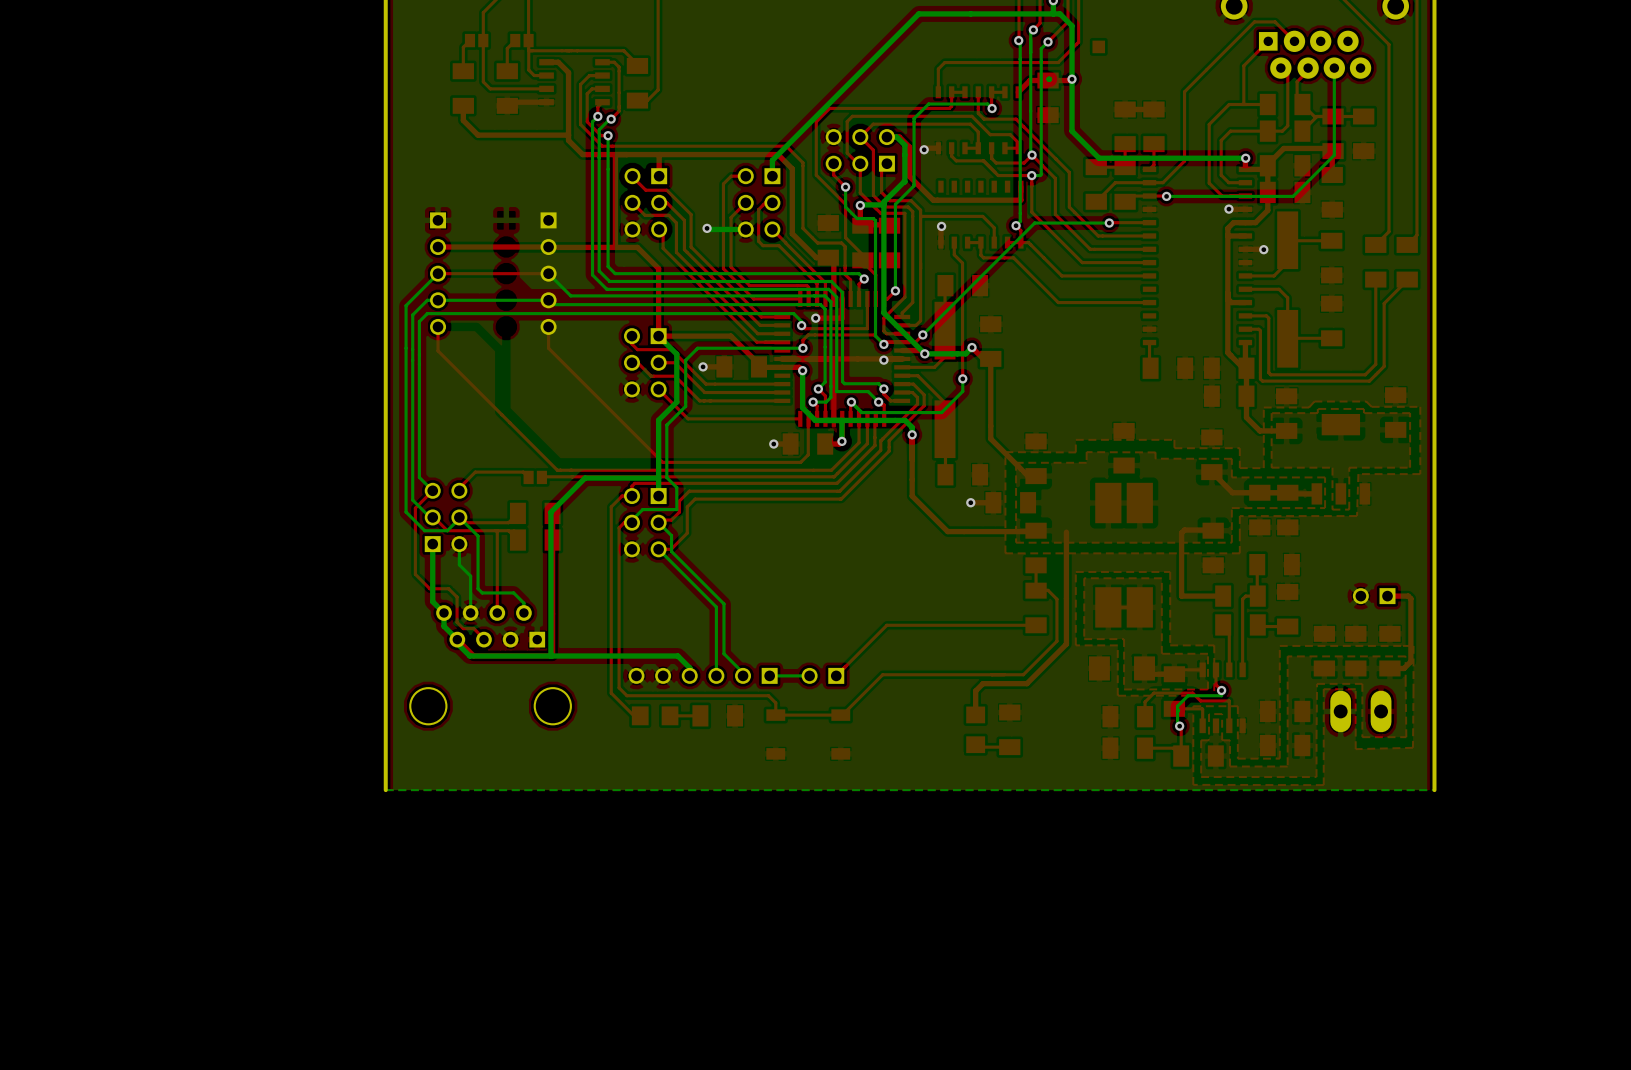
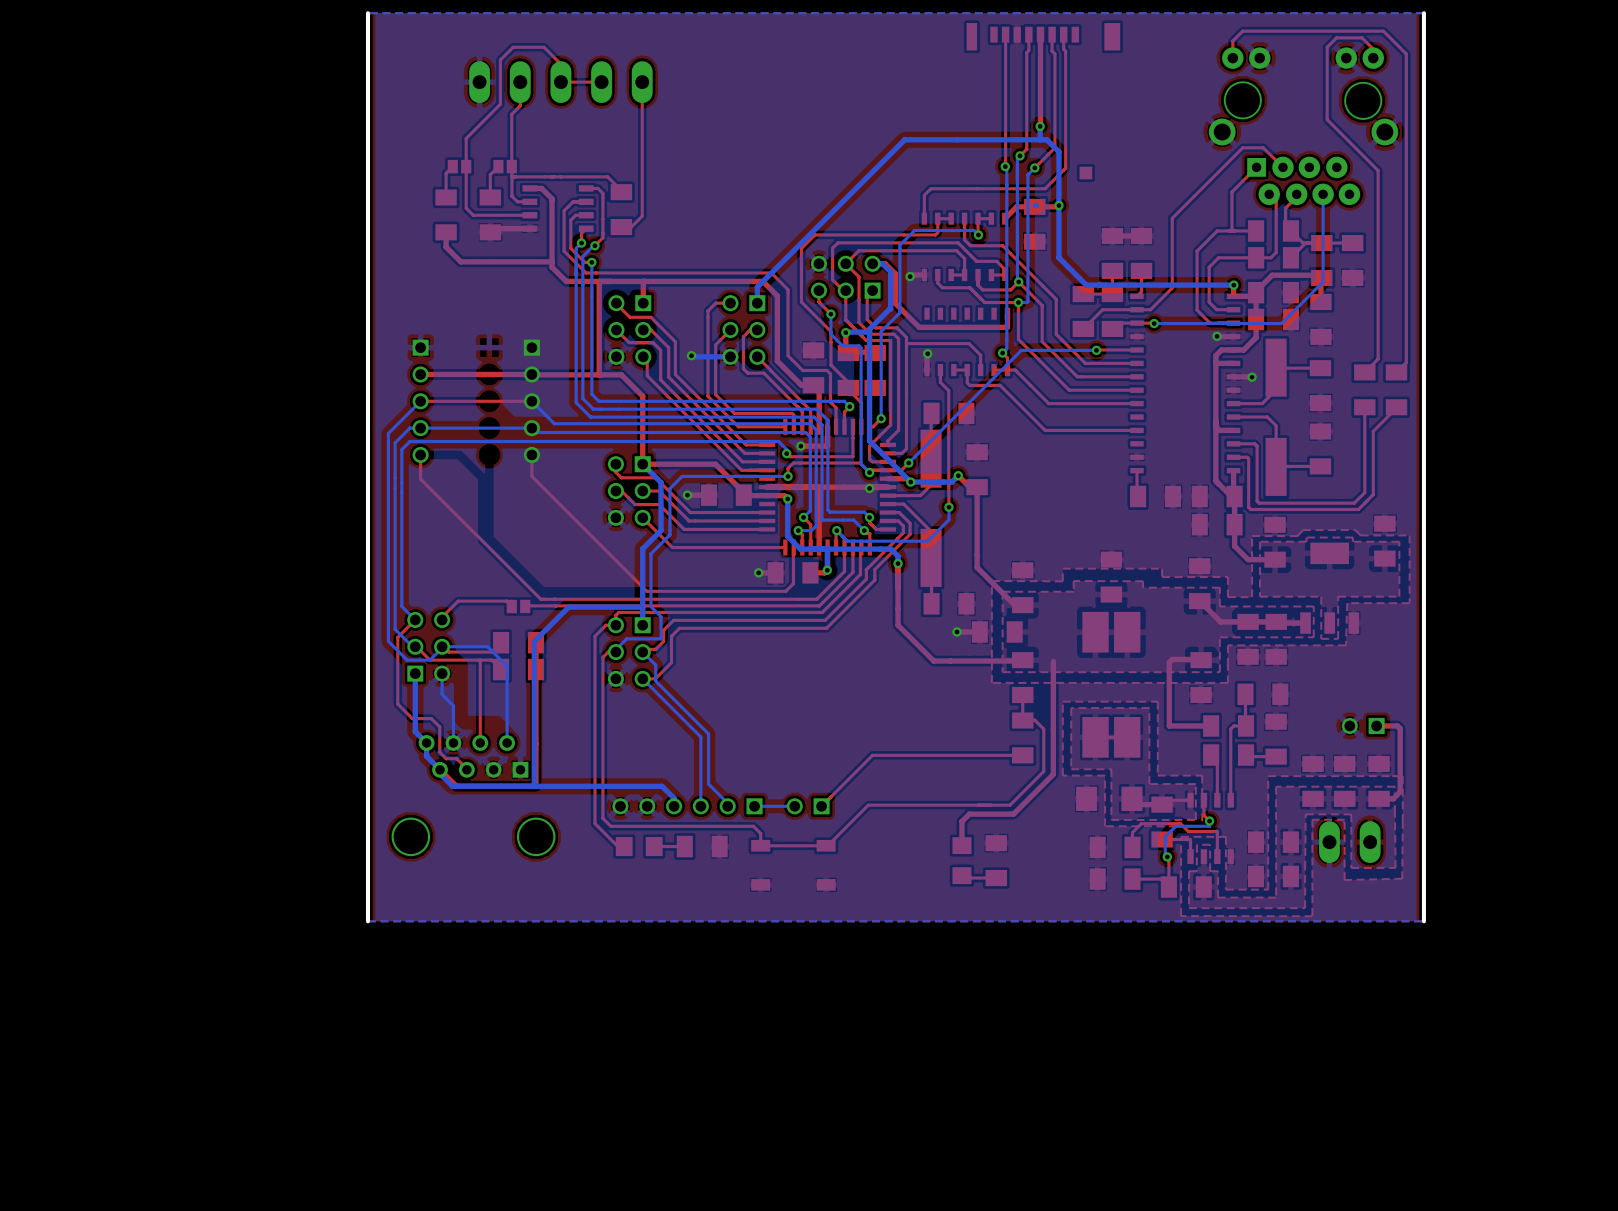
bottom track: (459, 517) (478, 536) (478, 588) (482, 592) (513, 592) (523, 603) -> (442, 646) (487, 646) (507, 666) (507, 733)

